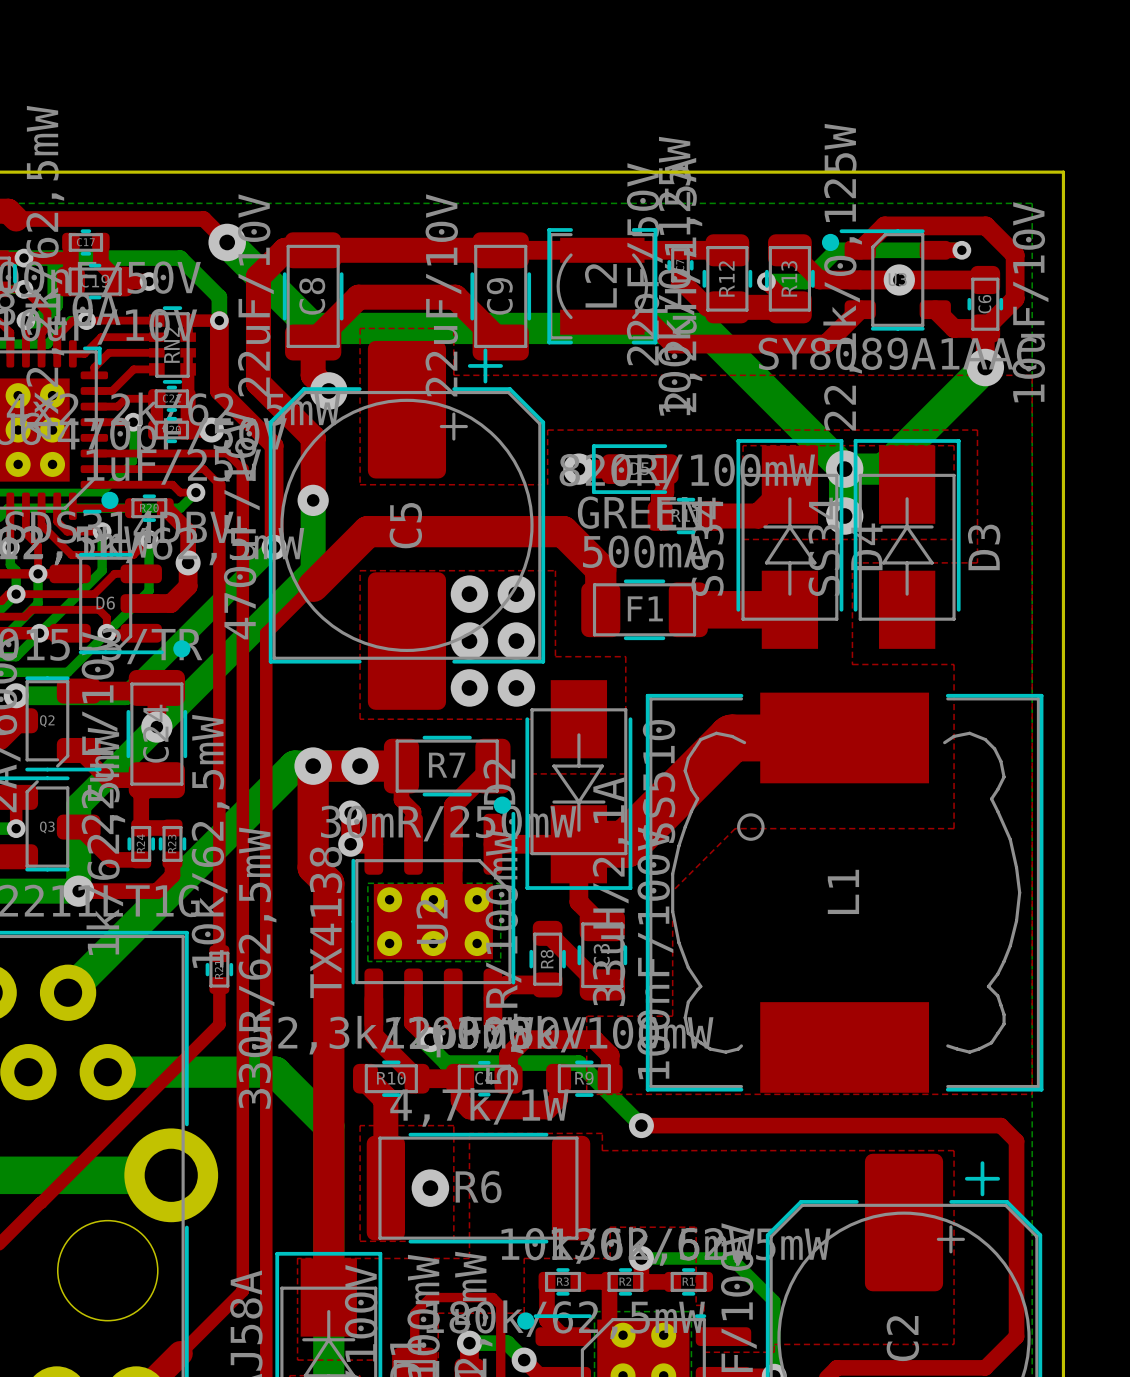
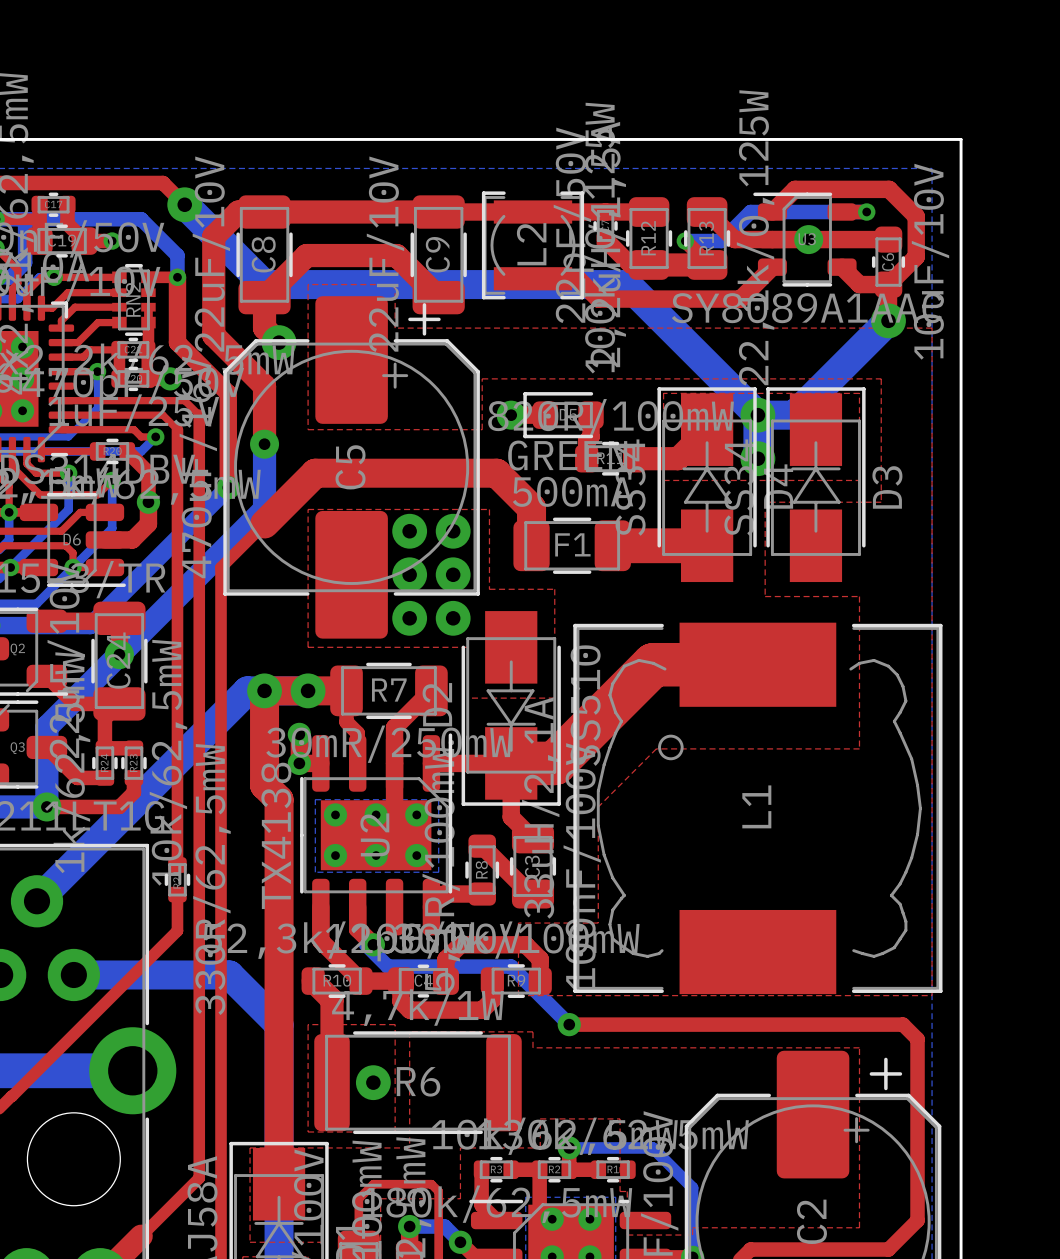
drawing: [821, 233, 840, 252] -> none
drawing: [101, 491, 119, 509] -> none
drawing: [173, 640, 191, 658] -> none
drawing: [493, 796, 511, 814] -> none
drawing: [517, 1312, 535, 1330] -> none

